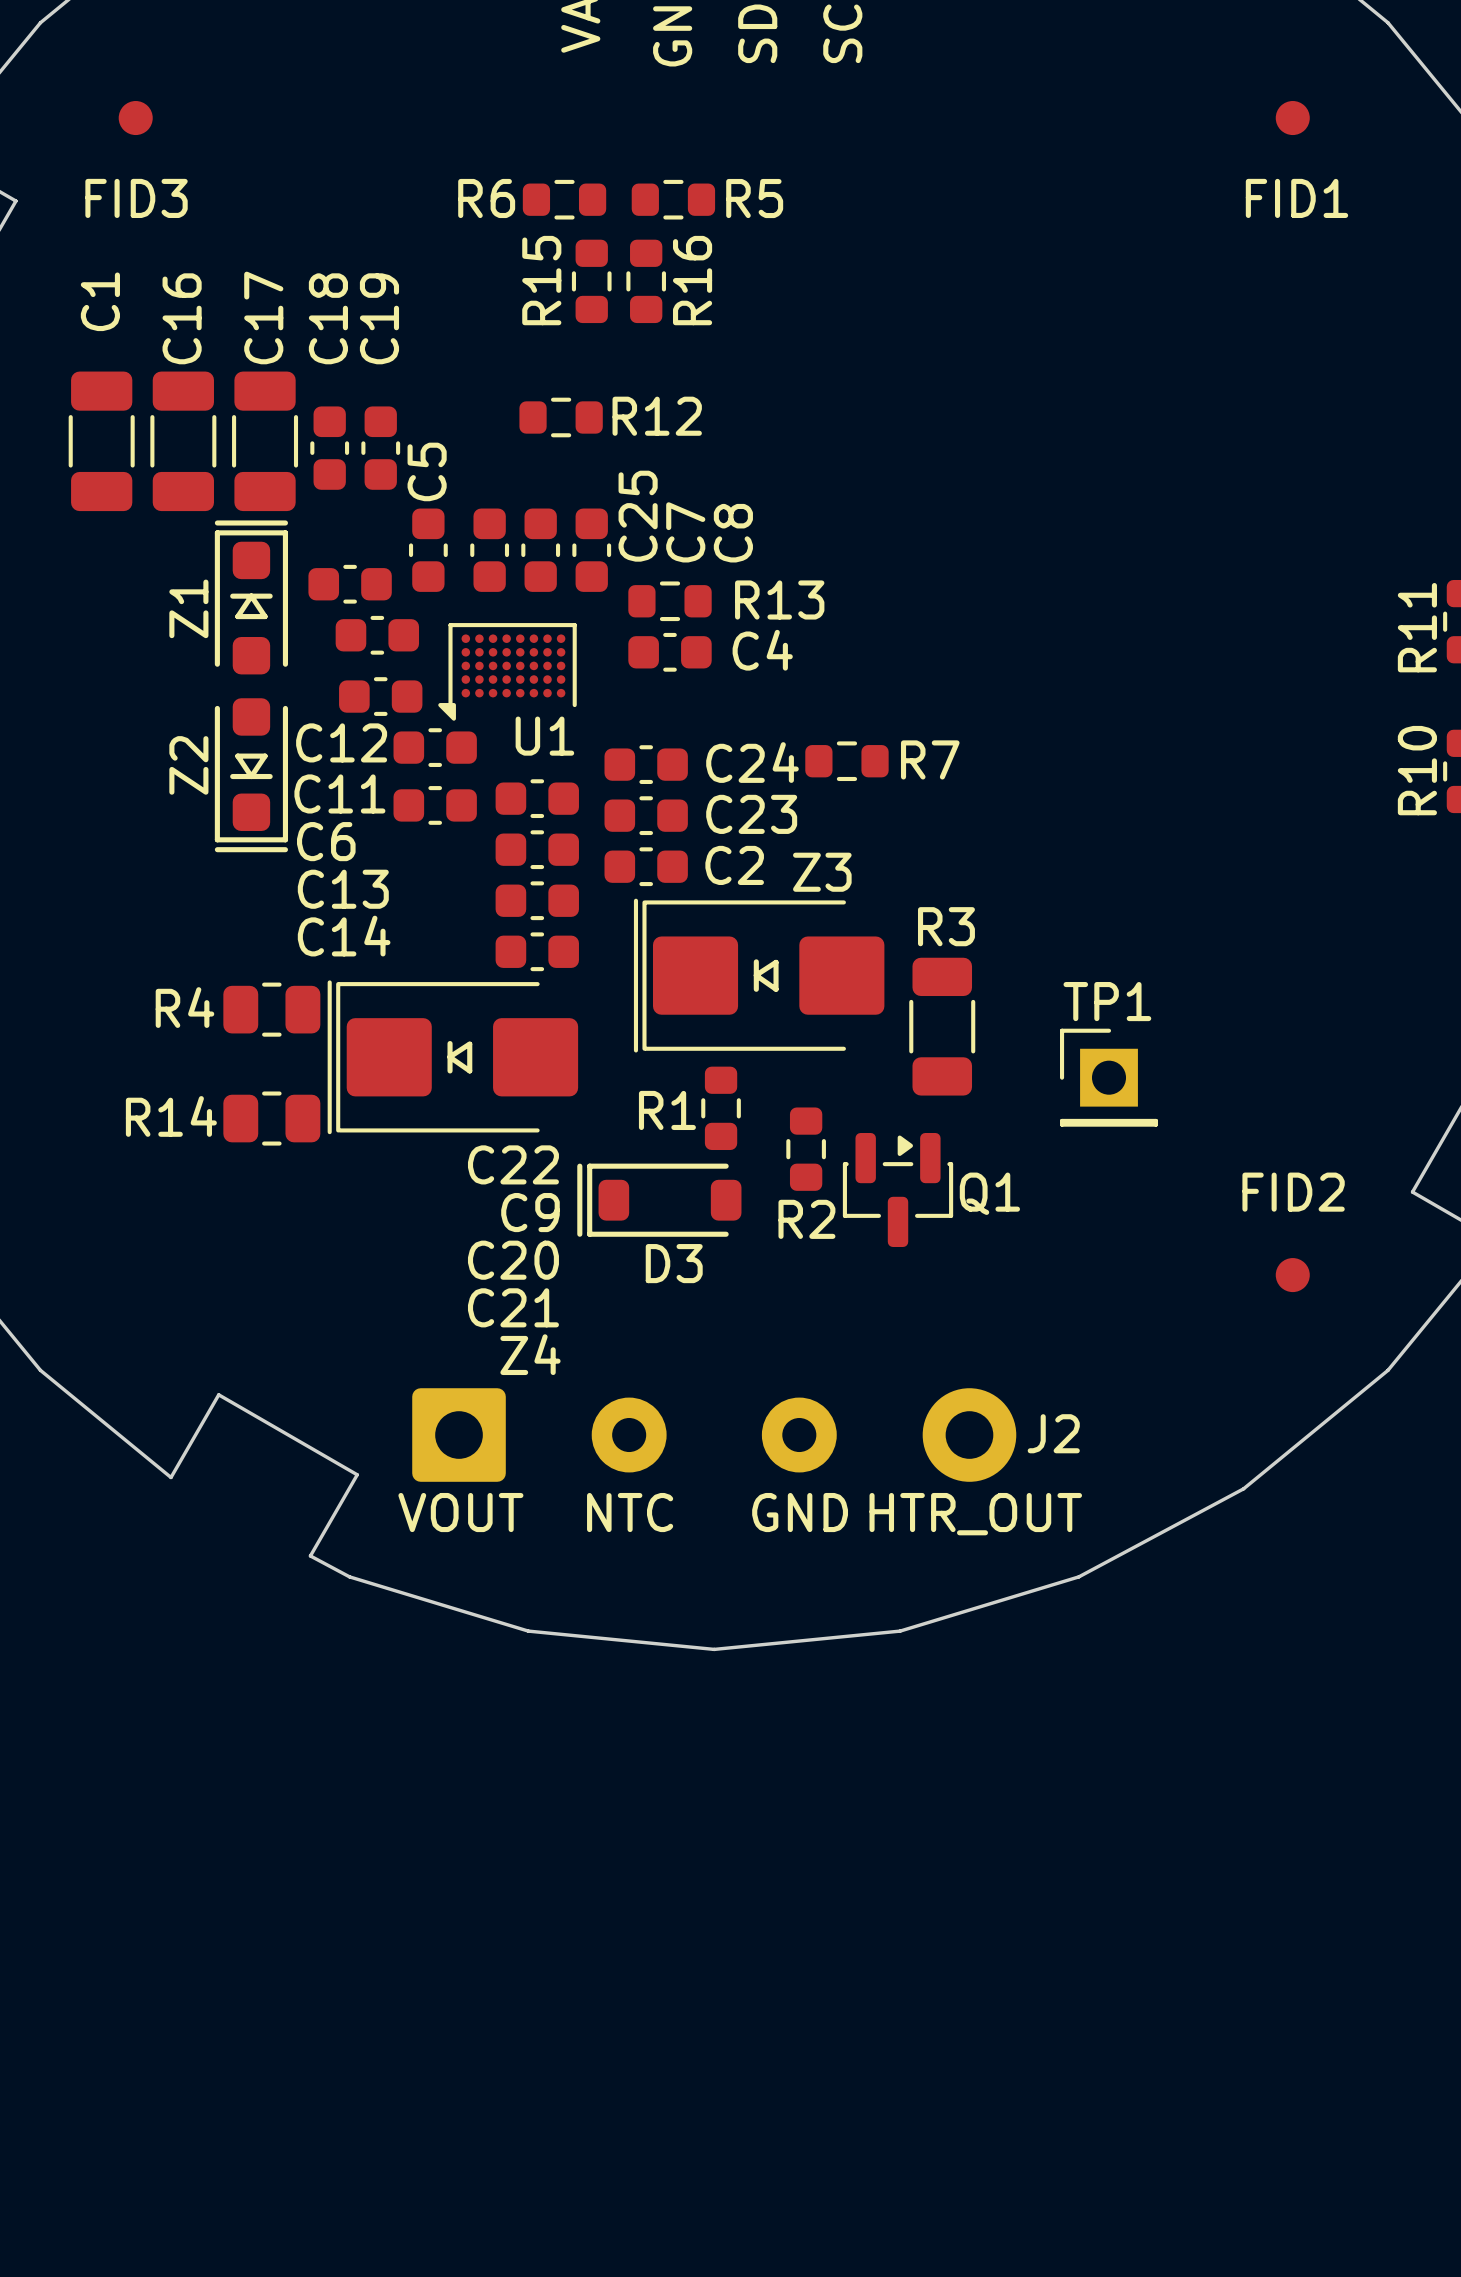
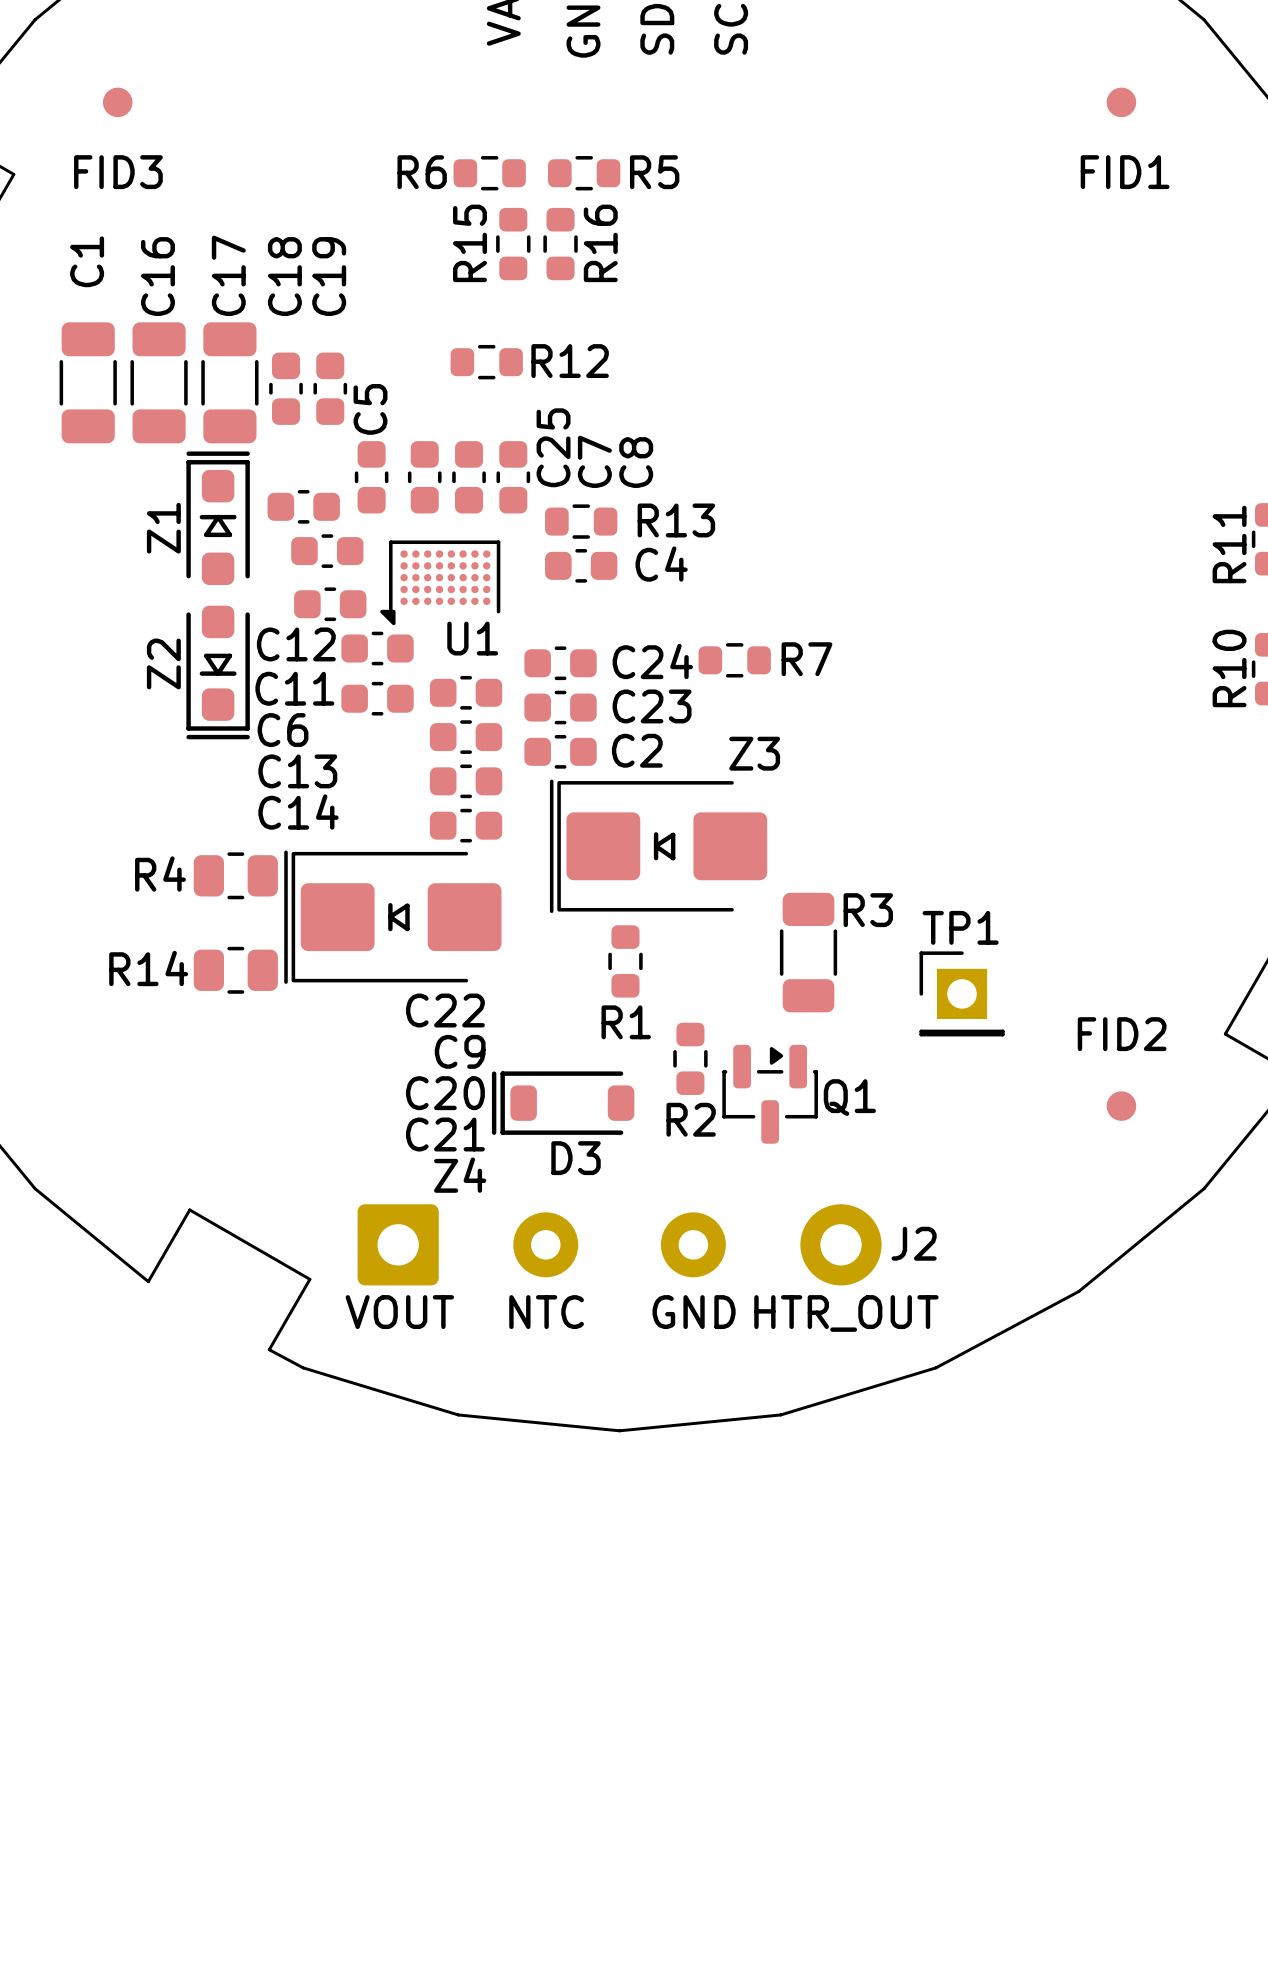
Z3 name position: Z3 (822, 872) -> Z3 (754, 753)
R3 name position: R3 (946, 926) -> R3 (868, 910)
R3 position: (942, 1026) -> (808, 952)
TP1 position: (1109, 1077) -> (962, 993)
R1 name position: R1 (667, 1110) -> R1 (626, 1022)
R2 position: (806, 1149) -> (690, 1058)
Q1 position: (898, 1189) -> (770, 1094)
D3 position: (659, 1200) -> (563, 1103)

